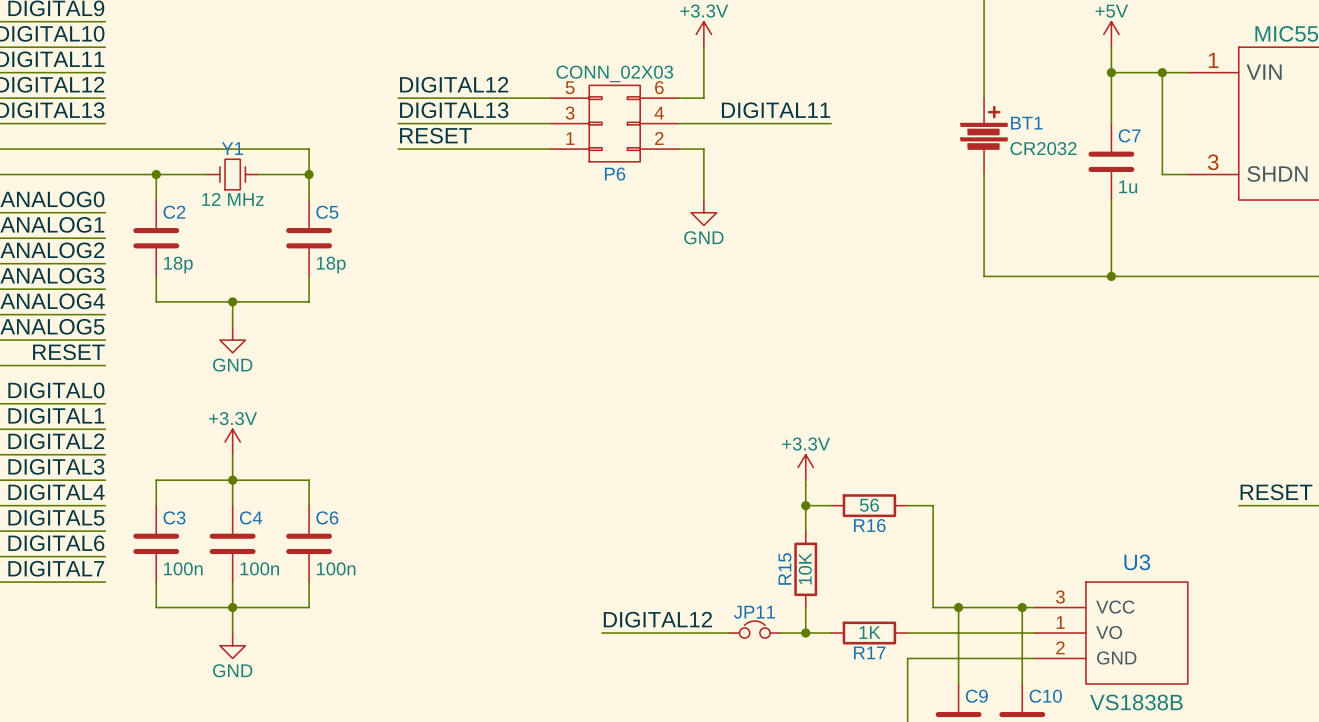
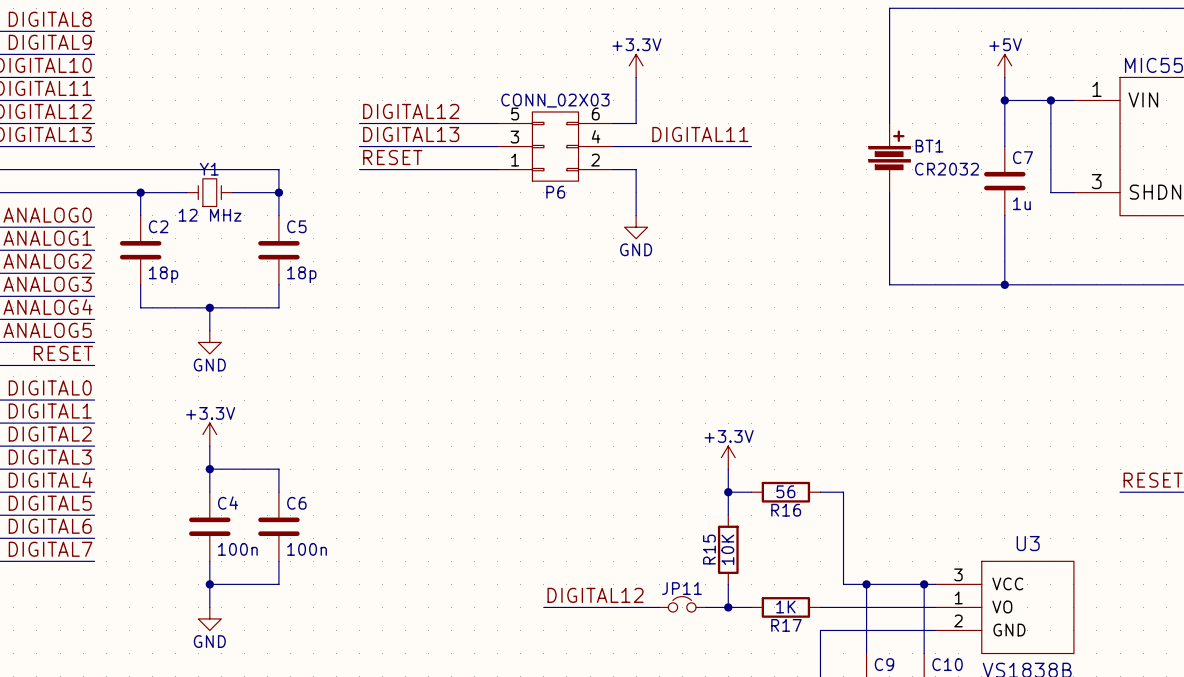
wire: (232, 480) (156, 480) (156, 505) -> none
C3: 100n (156, 543) -> none
wire: (156, 582) (156, 607) (232, 607) -> none

